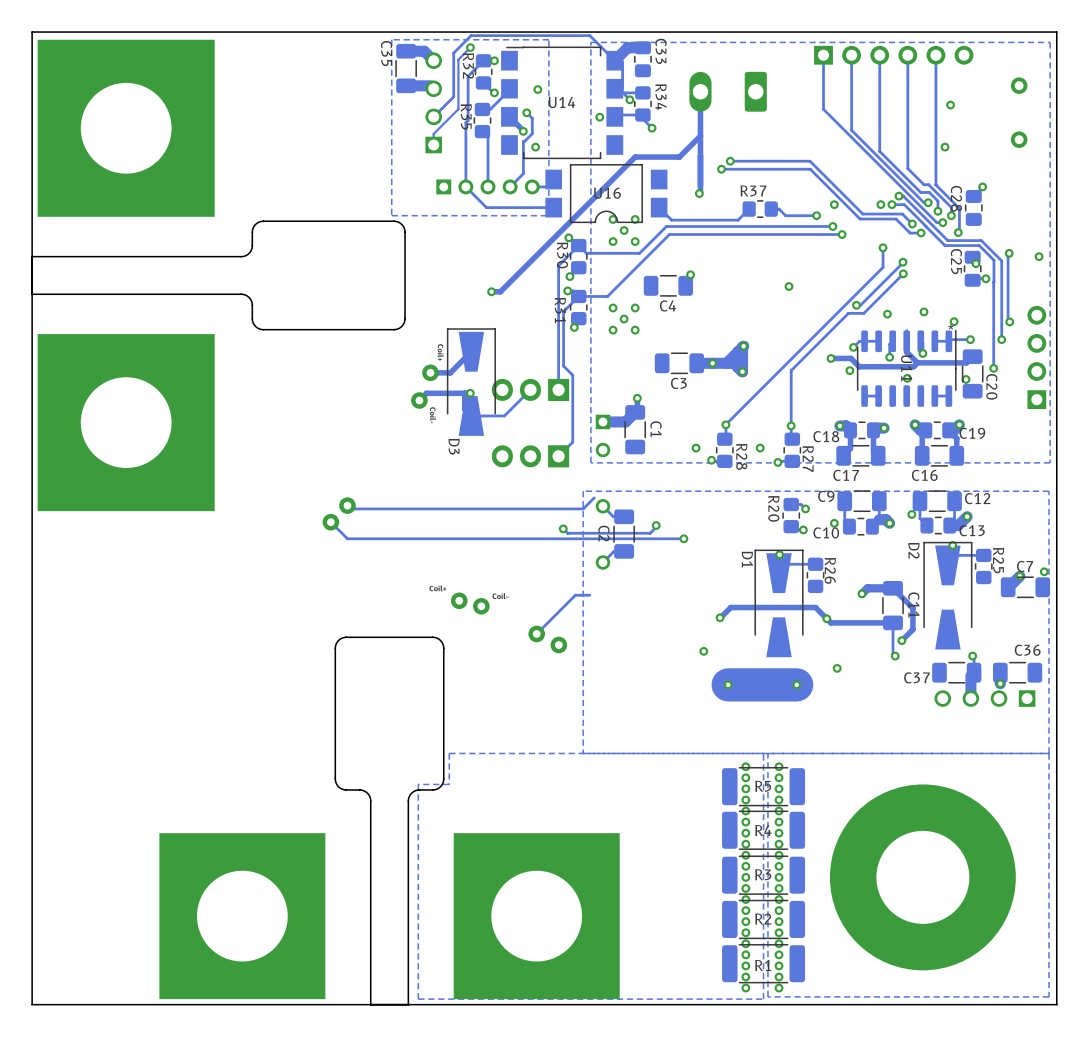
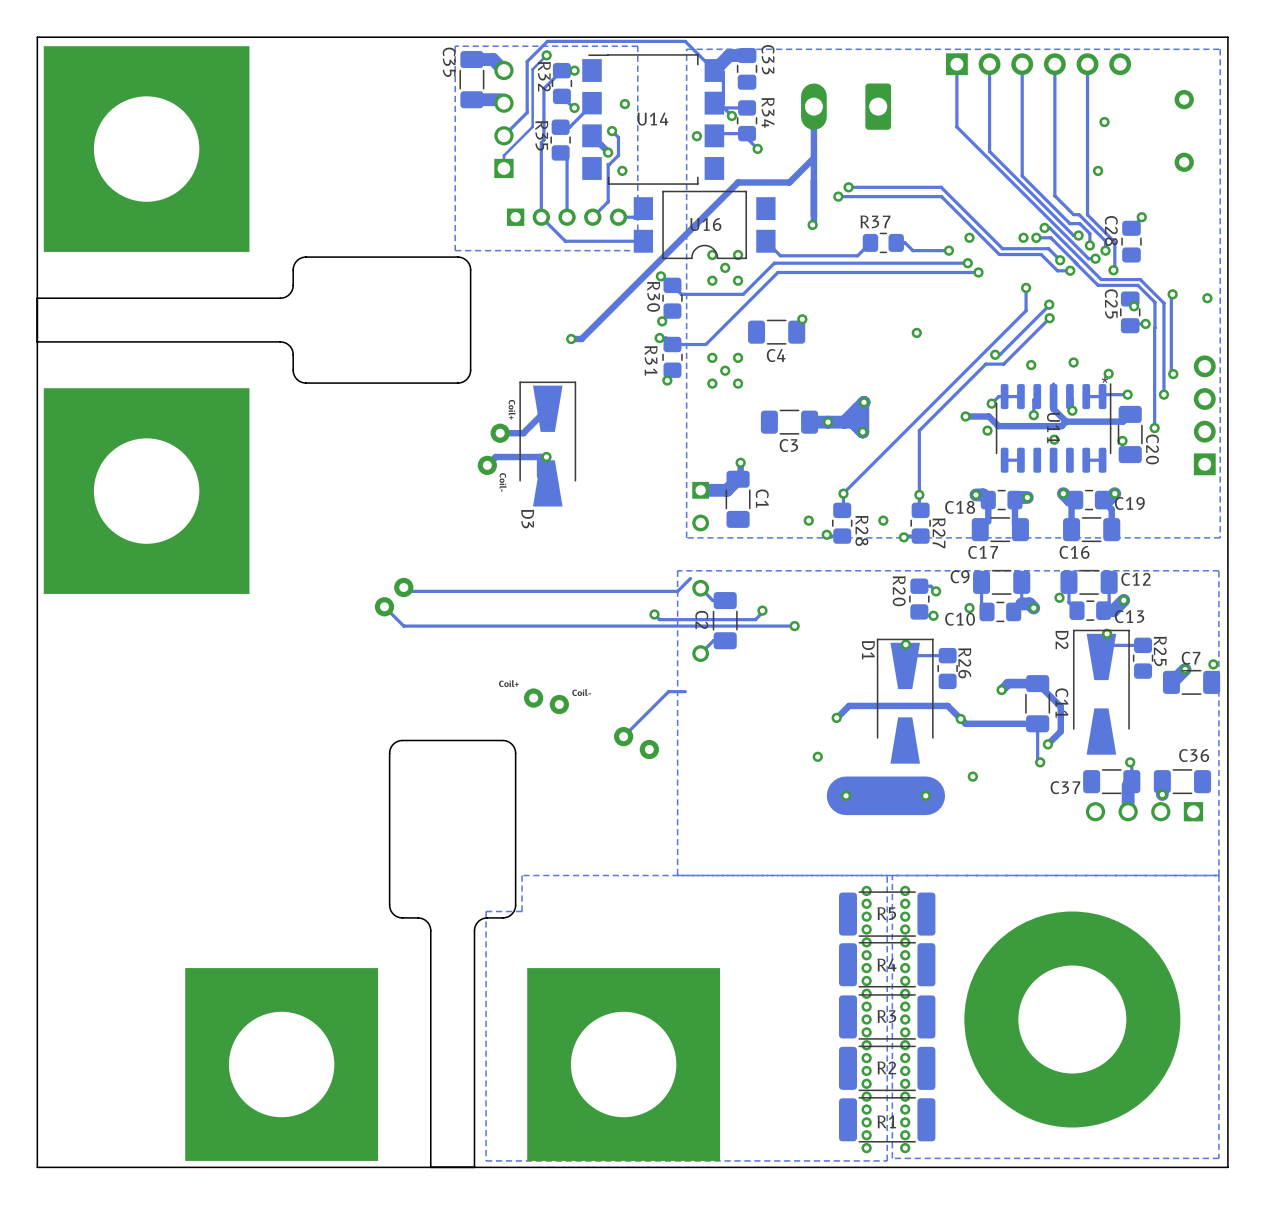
track: (578, 245) (558, 265) (558, 389) -> none
track: (578, 296) (563, 311) (563, 366) (572, 375) (572, 442) (558, 456) -> none
track: (530, 389) (504, 415) (471, 415) -> none
part: (530, 389) -> none
part: (530, 456) -> none

